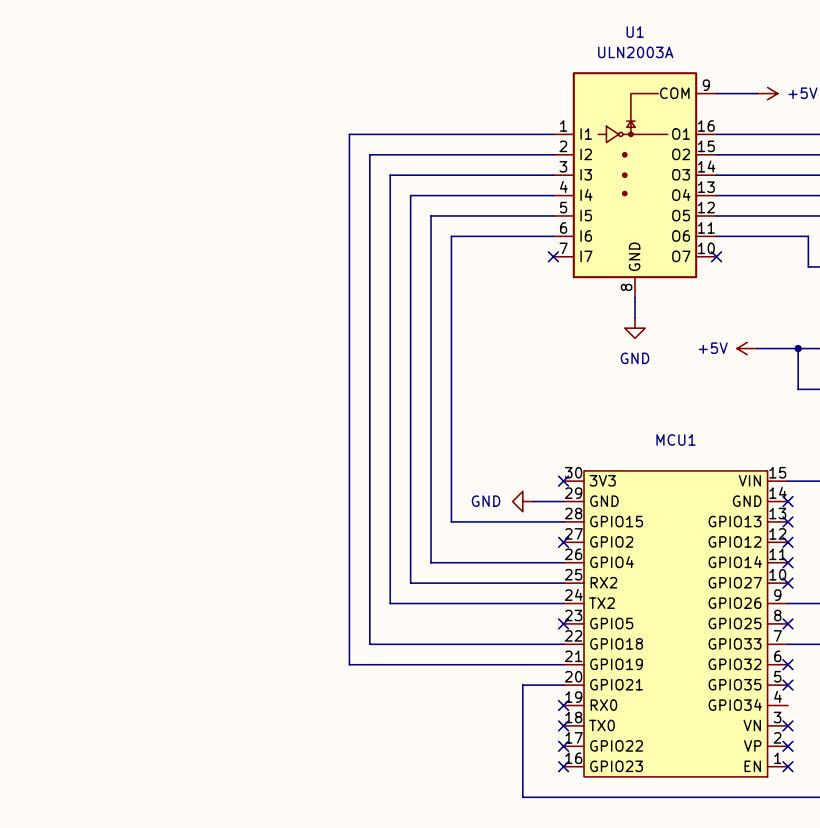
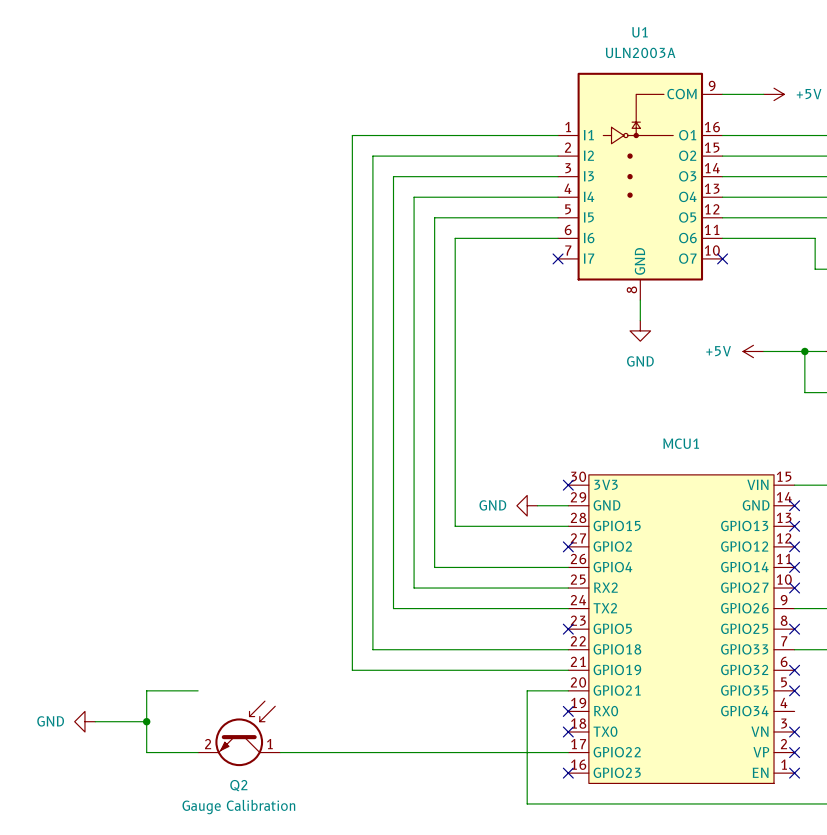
wire: none -> (198, 690) (146, 690) (146, 752) (198, 752)
power symbol: none -> GND (84, 721)
wire: none -> (95, 721) (146, 721)
junction: none -> (146, 721)
Q2: none -> Gauge Calibration (239, 733)
wire: none -> (280, 752) (568, 752)
no-connect mark: (563, 746) -> none

